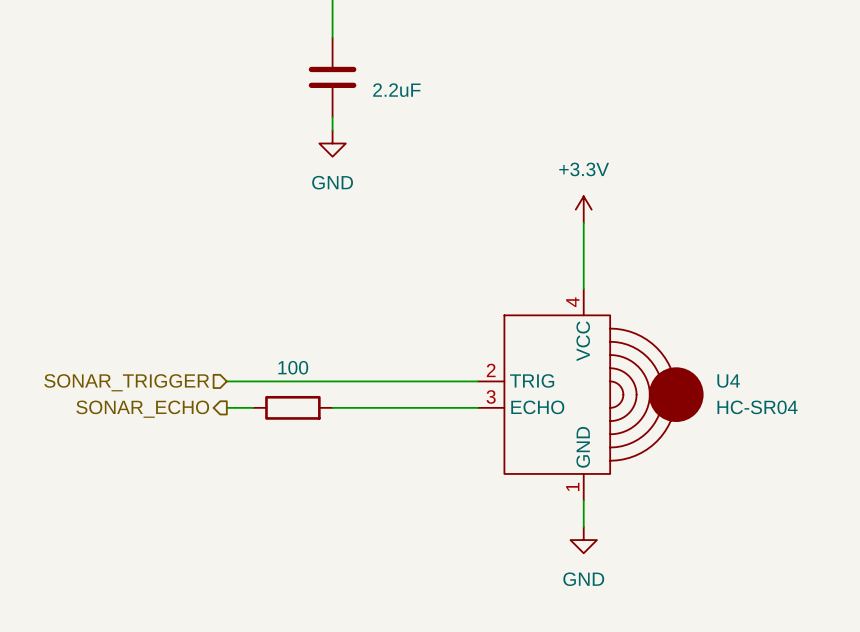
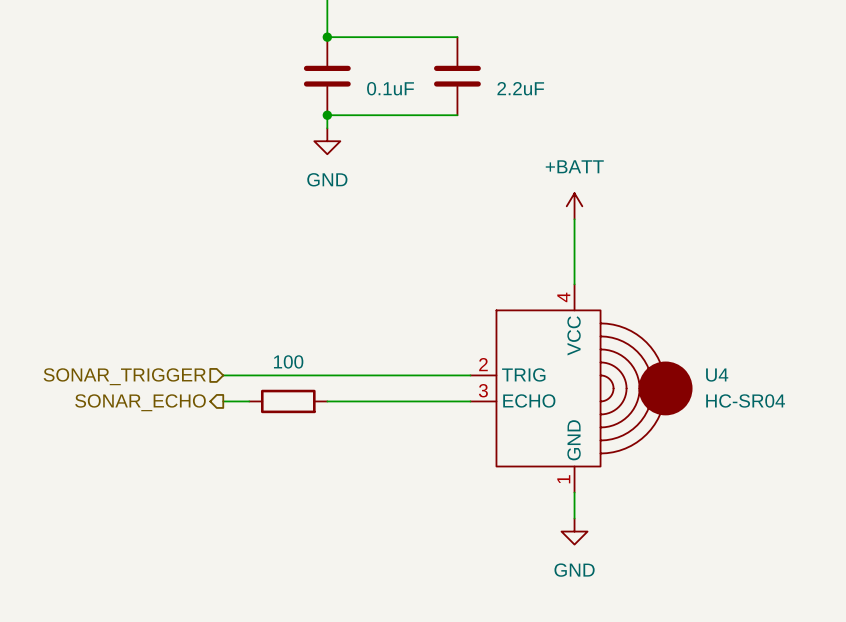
wire: none -> (327, 37) (457, 37)
junction: none -> (327, 37)
part: none -> 2.2uF (457, 76)
part value: 2.2uF (396, 90) -> 0.1uF (390, 88)
wire: none -> (327, 115) (457, 115)
junction: none -> (327, 115)
power symbol: +3.3V (583, 209) -> +BATT (574, 206)

